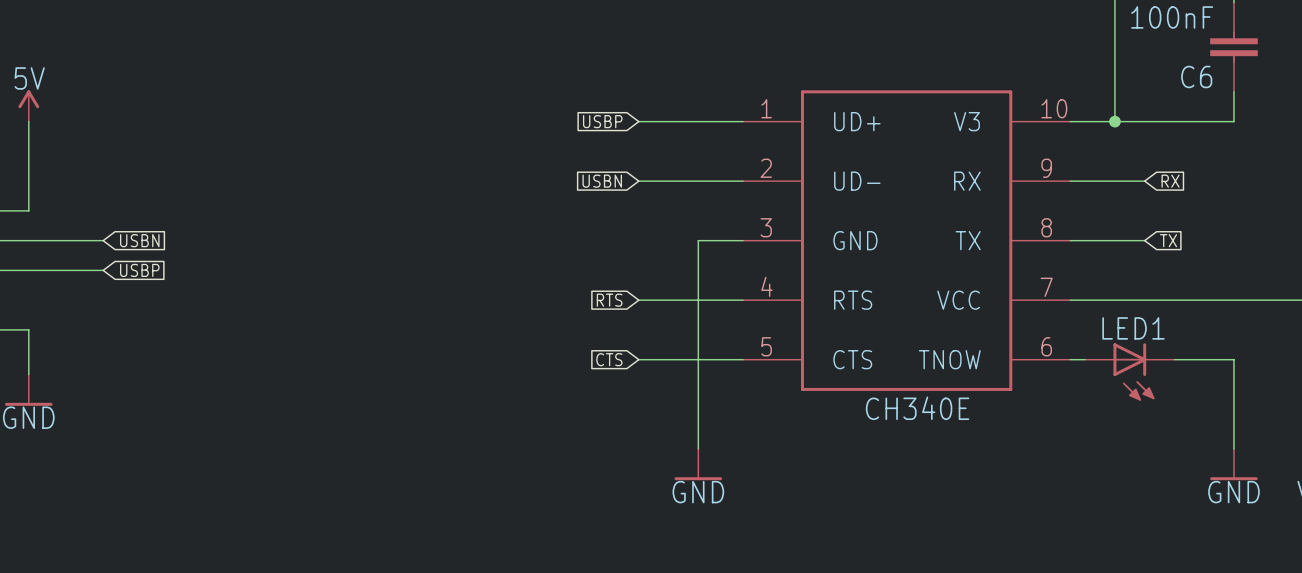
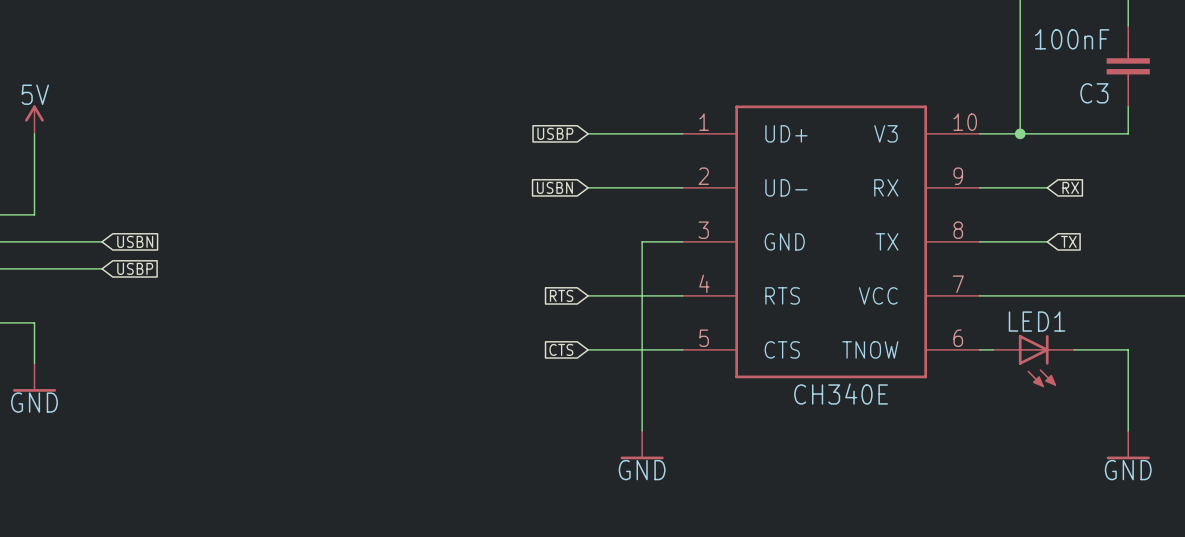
C6 name: C6 (1196, 76) -> C3 (1094, 93)

